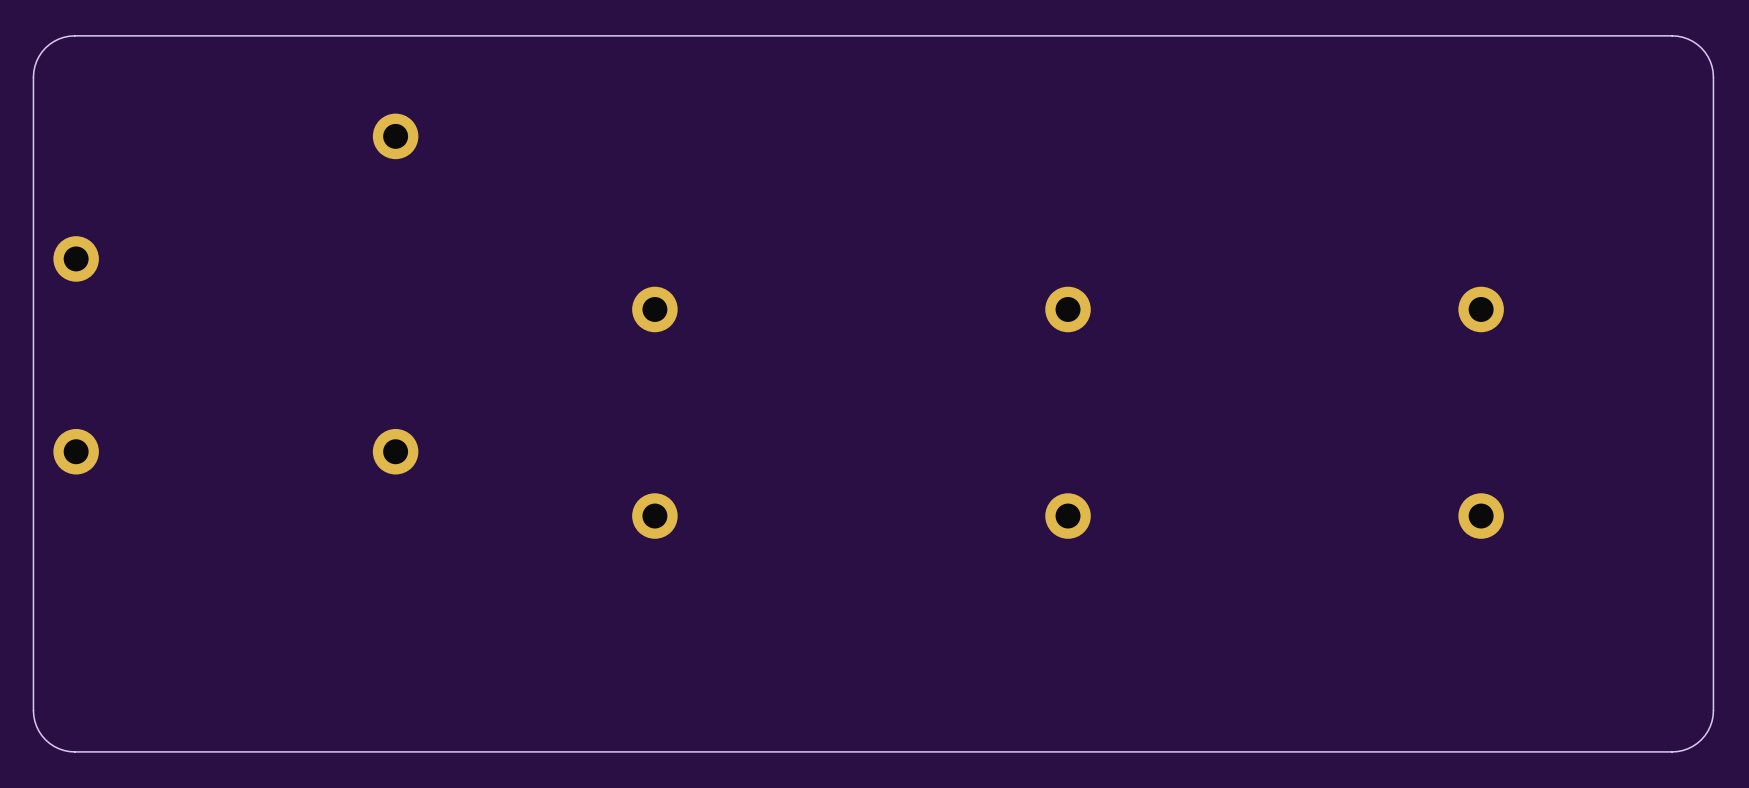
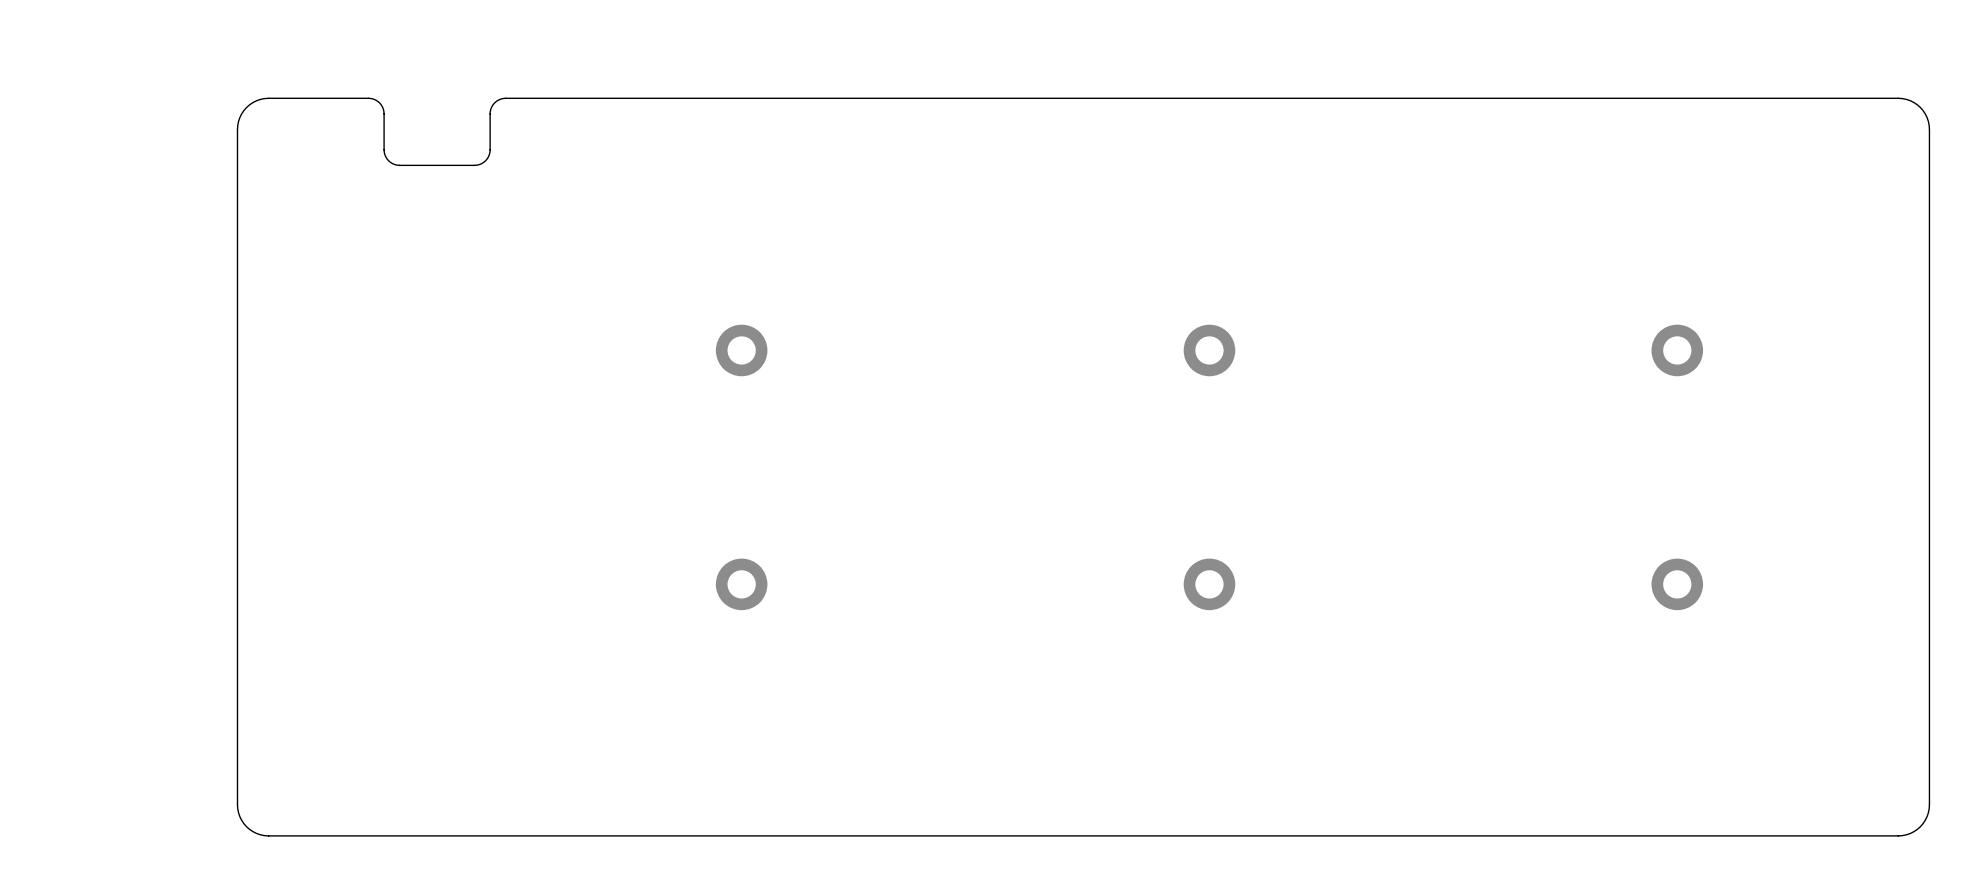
board edge: (1672, 35) (74, 35) (58, 39) (45, 47) (38, 56) (33, 77) (33, 710) (36, 726) (45, 739) (54, 746) (74, 751) (1672, 751) (1687, 748) (1704, 735) (1712, 721) (1713, 710) (1713, 77) (1710, 61) (1701, 47) (1687, 39) (1672, 35) -> (1898, 98) (1910, 100) (1920, 107) (1927, 117) (1929, 129) (1929, 804) (1927, 816) (1923, 823) (1910, 833) (1898, 835) (268, 835) (260, 834) (249, 829) (239, 816) (237, 804) (237, 129) (241, 113) (249, 104) (256, 100) (268, 98) (372, 98) (379, 102) (383, 109) (384, 151) (386, 157) (391, 163) (399, 165) (474, 165) (484, 162) (489, 153) (491, 107) (497, 100) (505, 98) (1898, 98)
part: (395, 136) -> none
part: (76, 258) -> none
part: (76, 451) -> none
part: (395, 451) -> none

